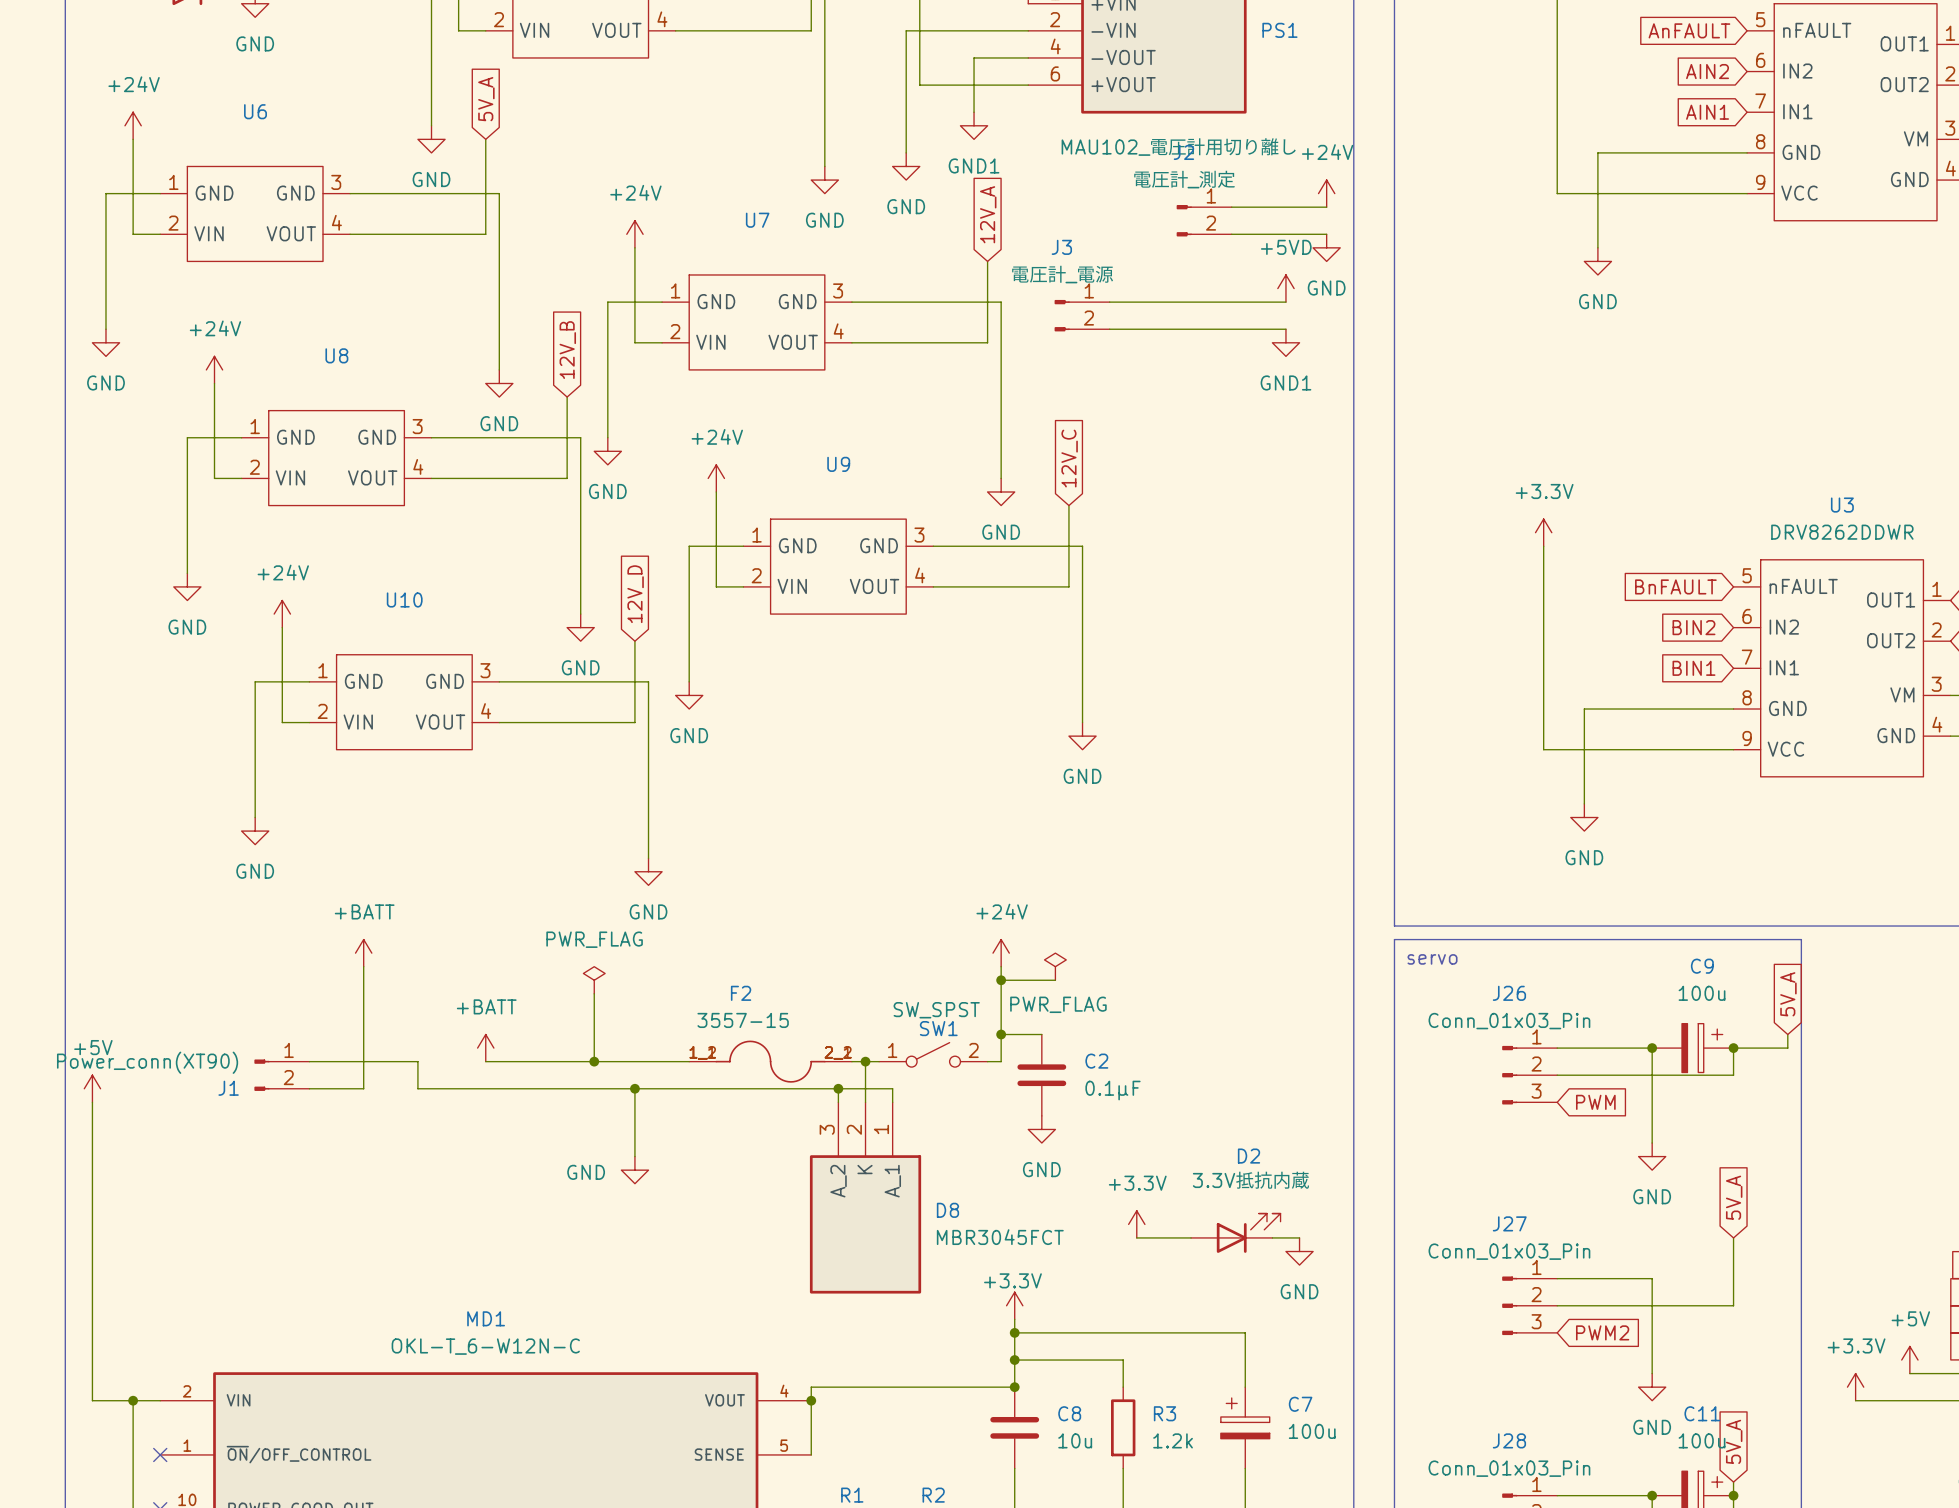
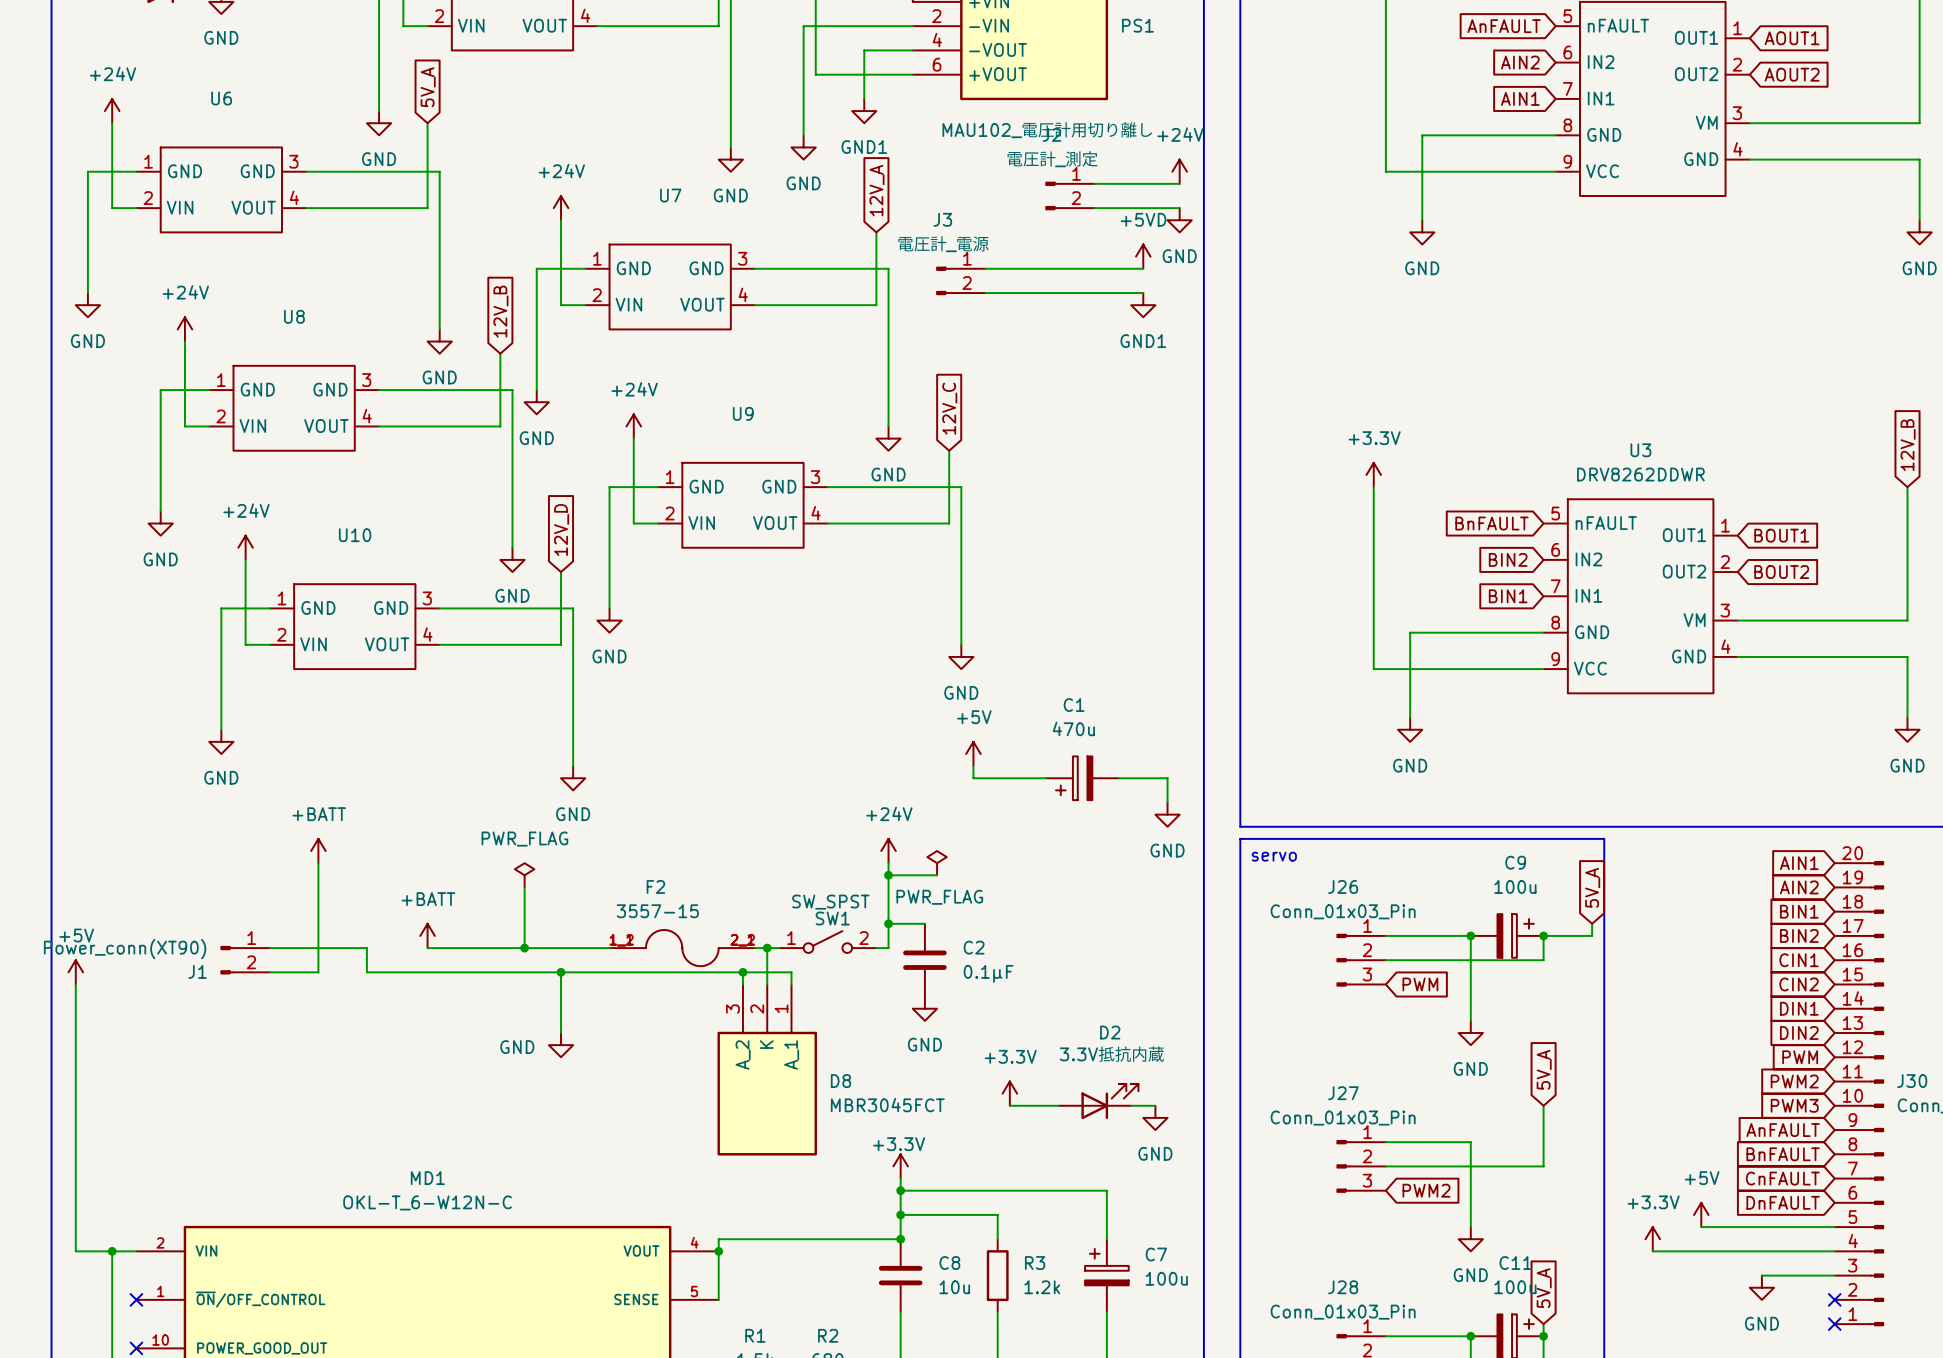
power symbol: none -> +5V (973, 753)
wire: none -> (973, 766) (973, 778) (1046, 778)
C1: none -> 470u (1082, 778)
wire: none -> (1119, 778) (1167, 778) (1167, 802)
power symbol: none -> GND (1167, 814)

